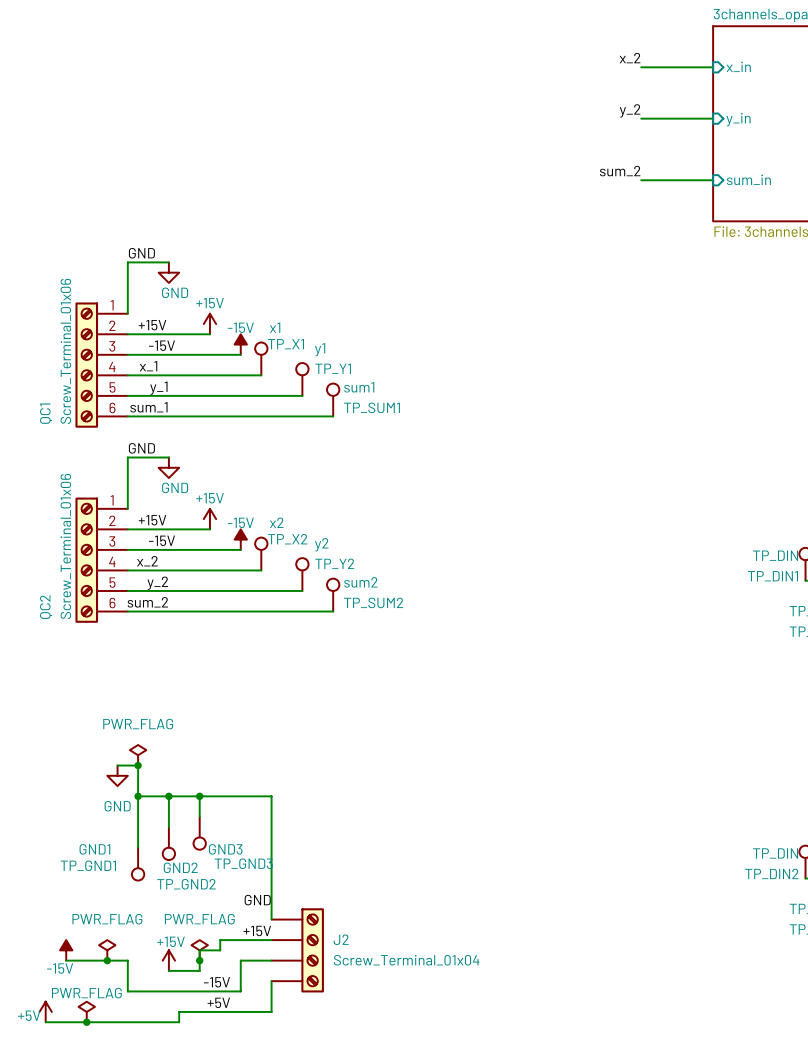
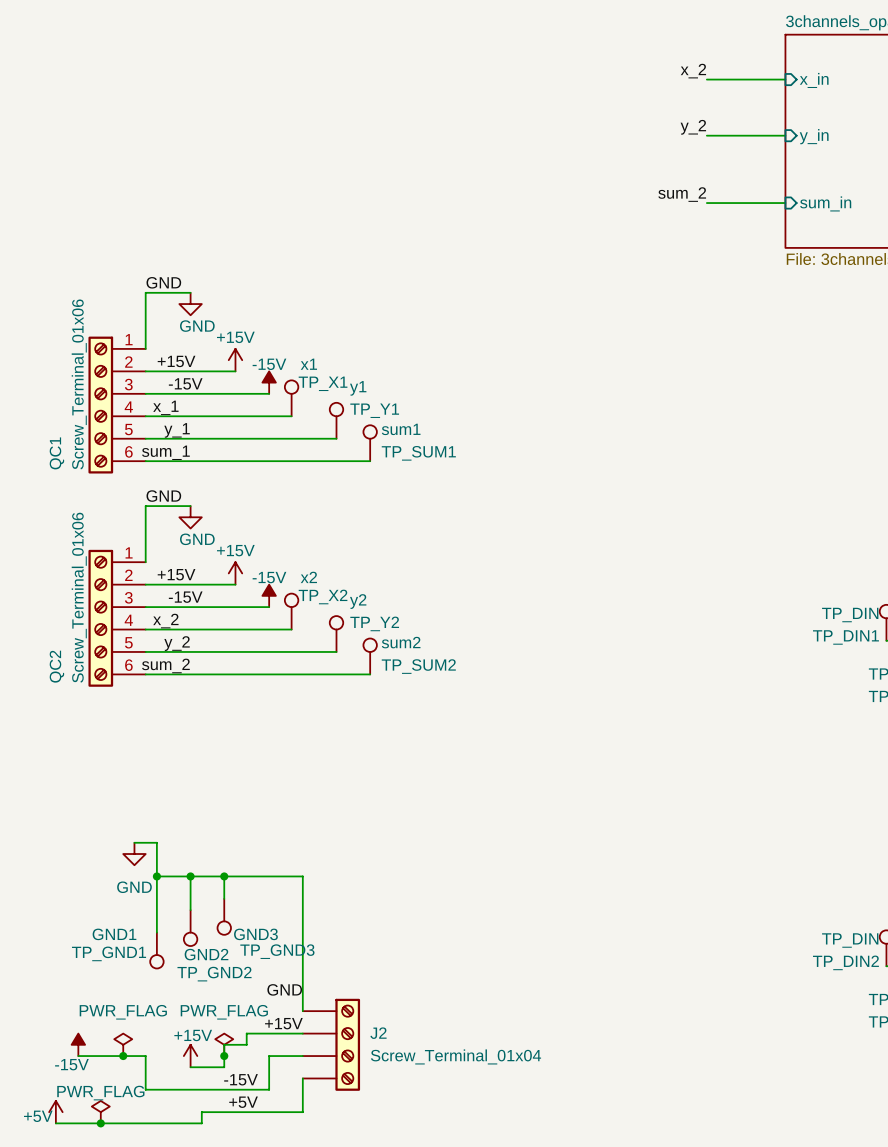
power symbol: PWR_FLAG (138, 755) -> none
junction: (138, 765) -> none

